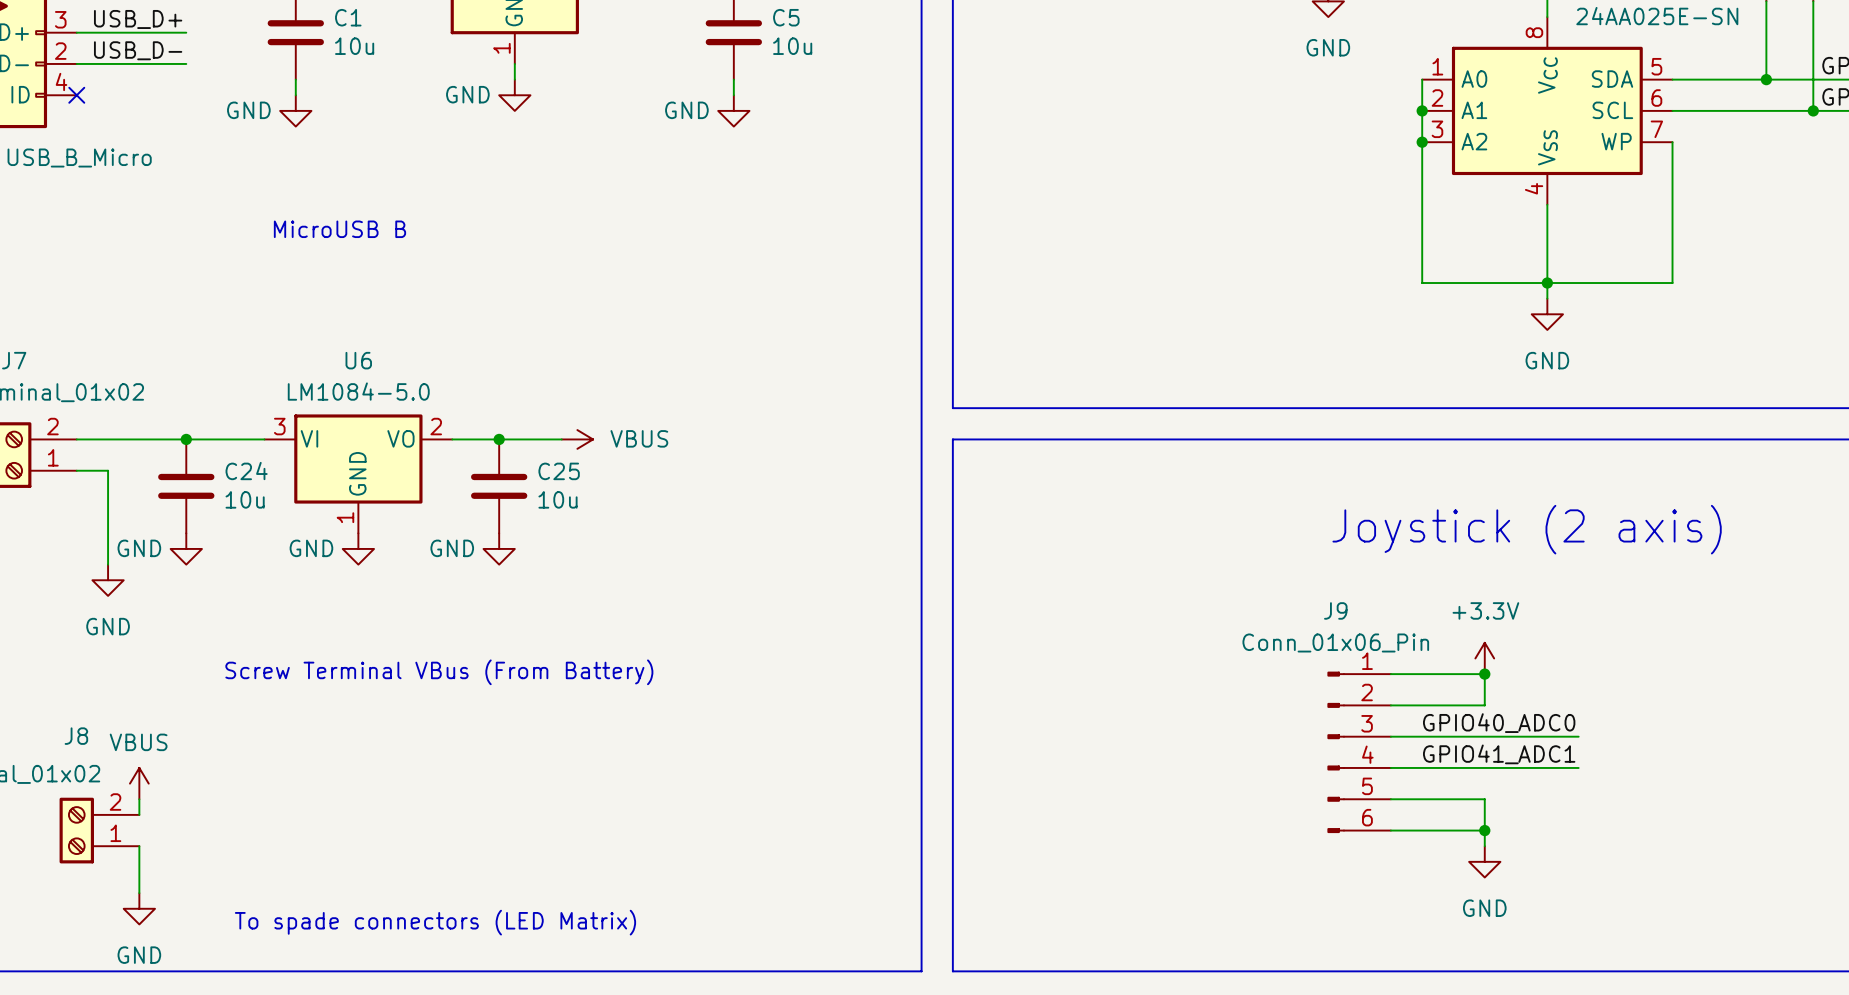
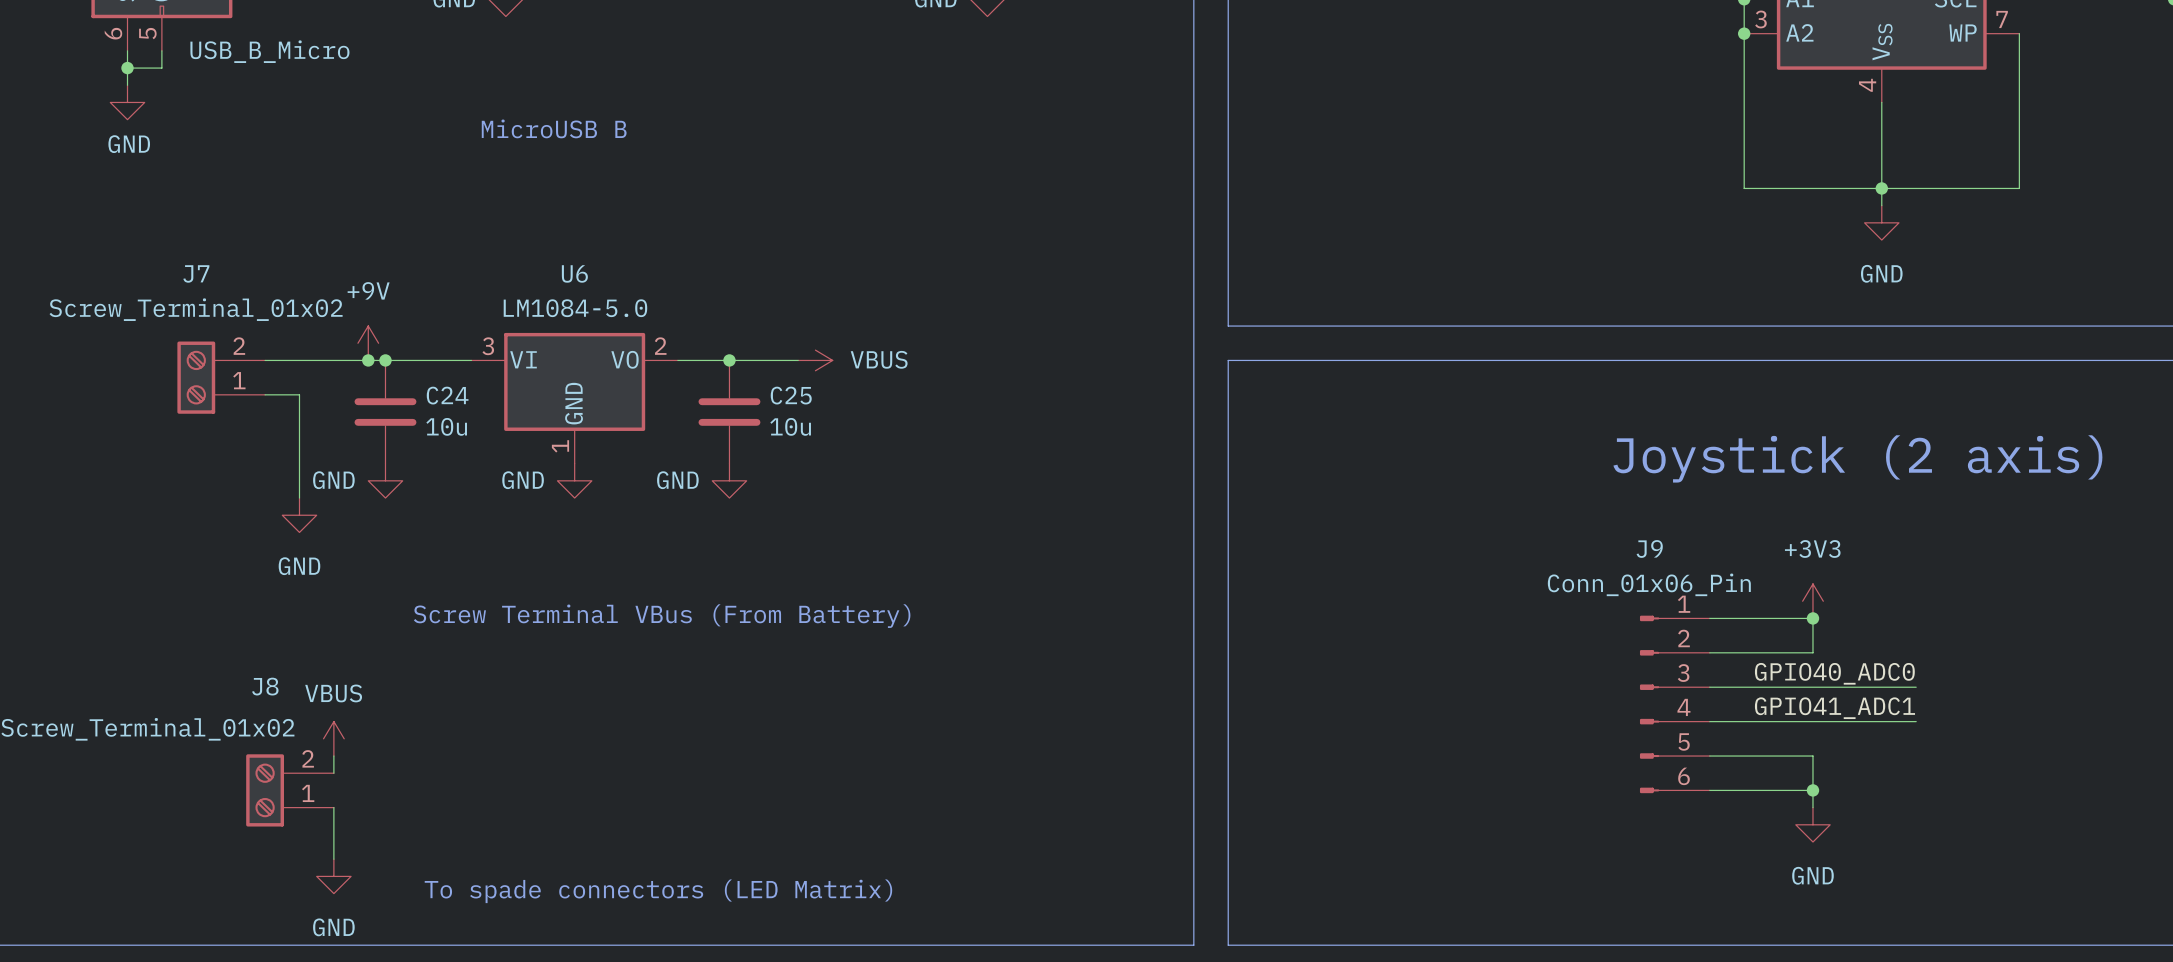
power symbol: none -> +9V (368, 343)
junction: none -> (368, 360)
power symbol: +3.3V (1484, 658) -> +3V3 (1812, 601)

